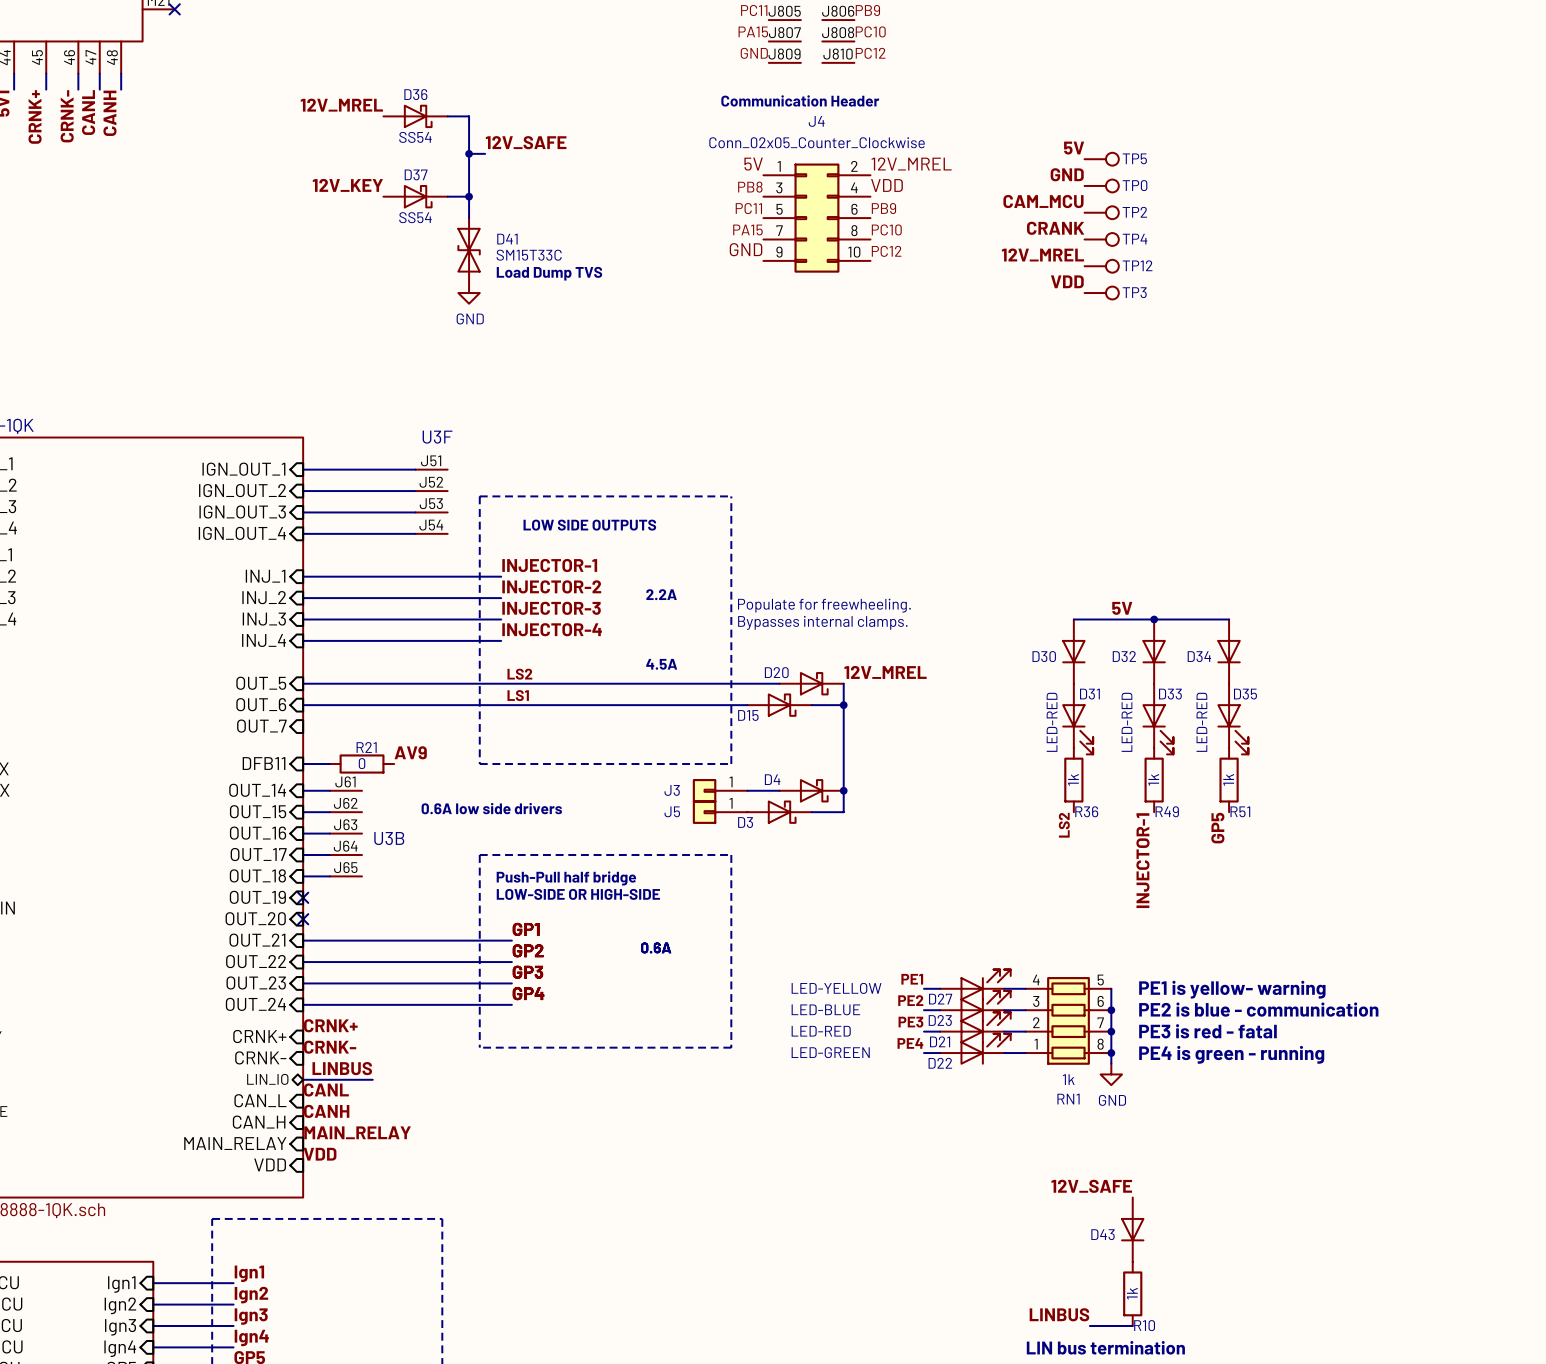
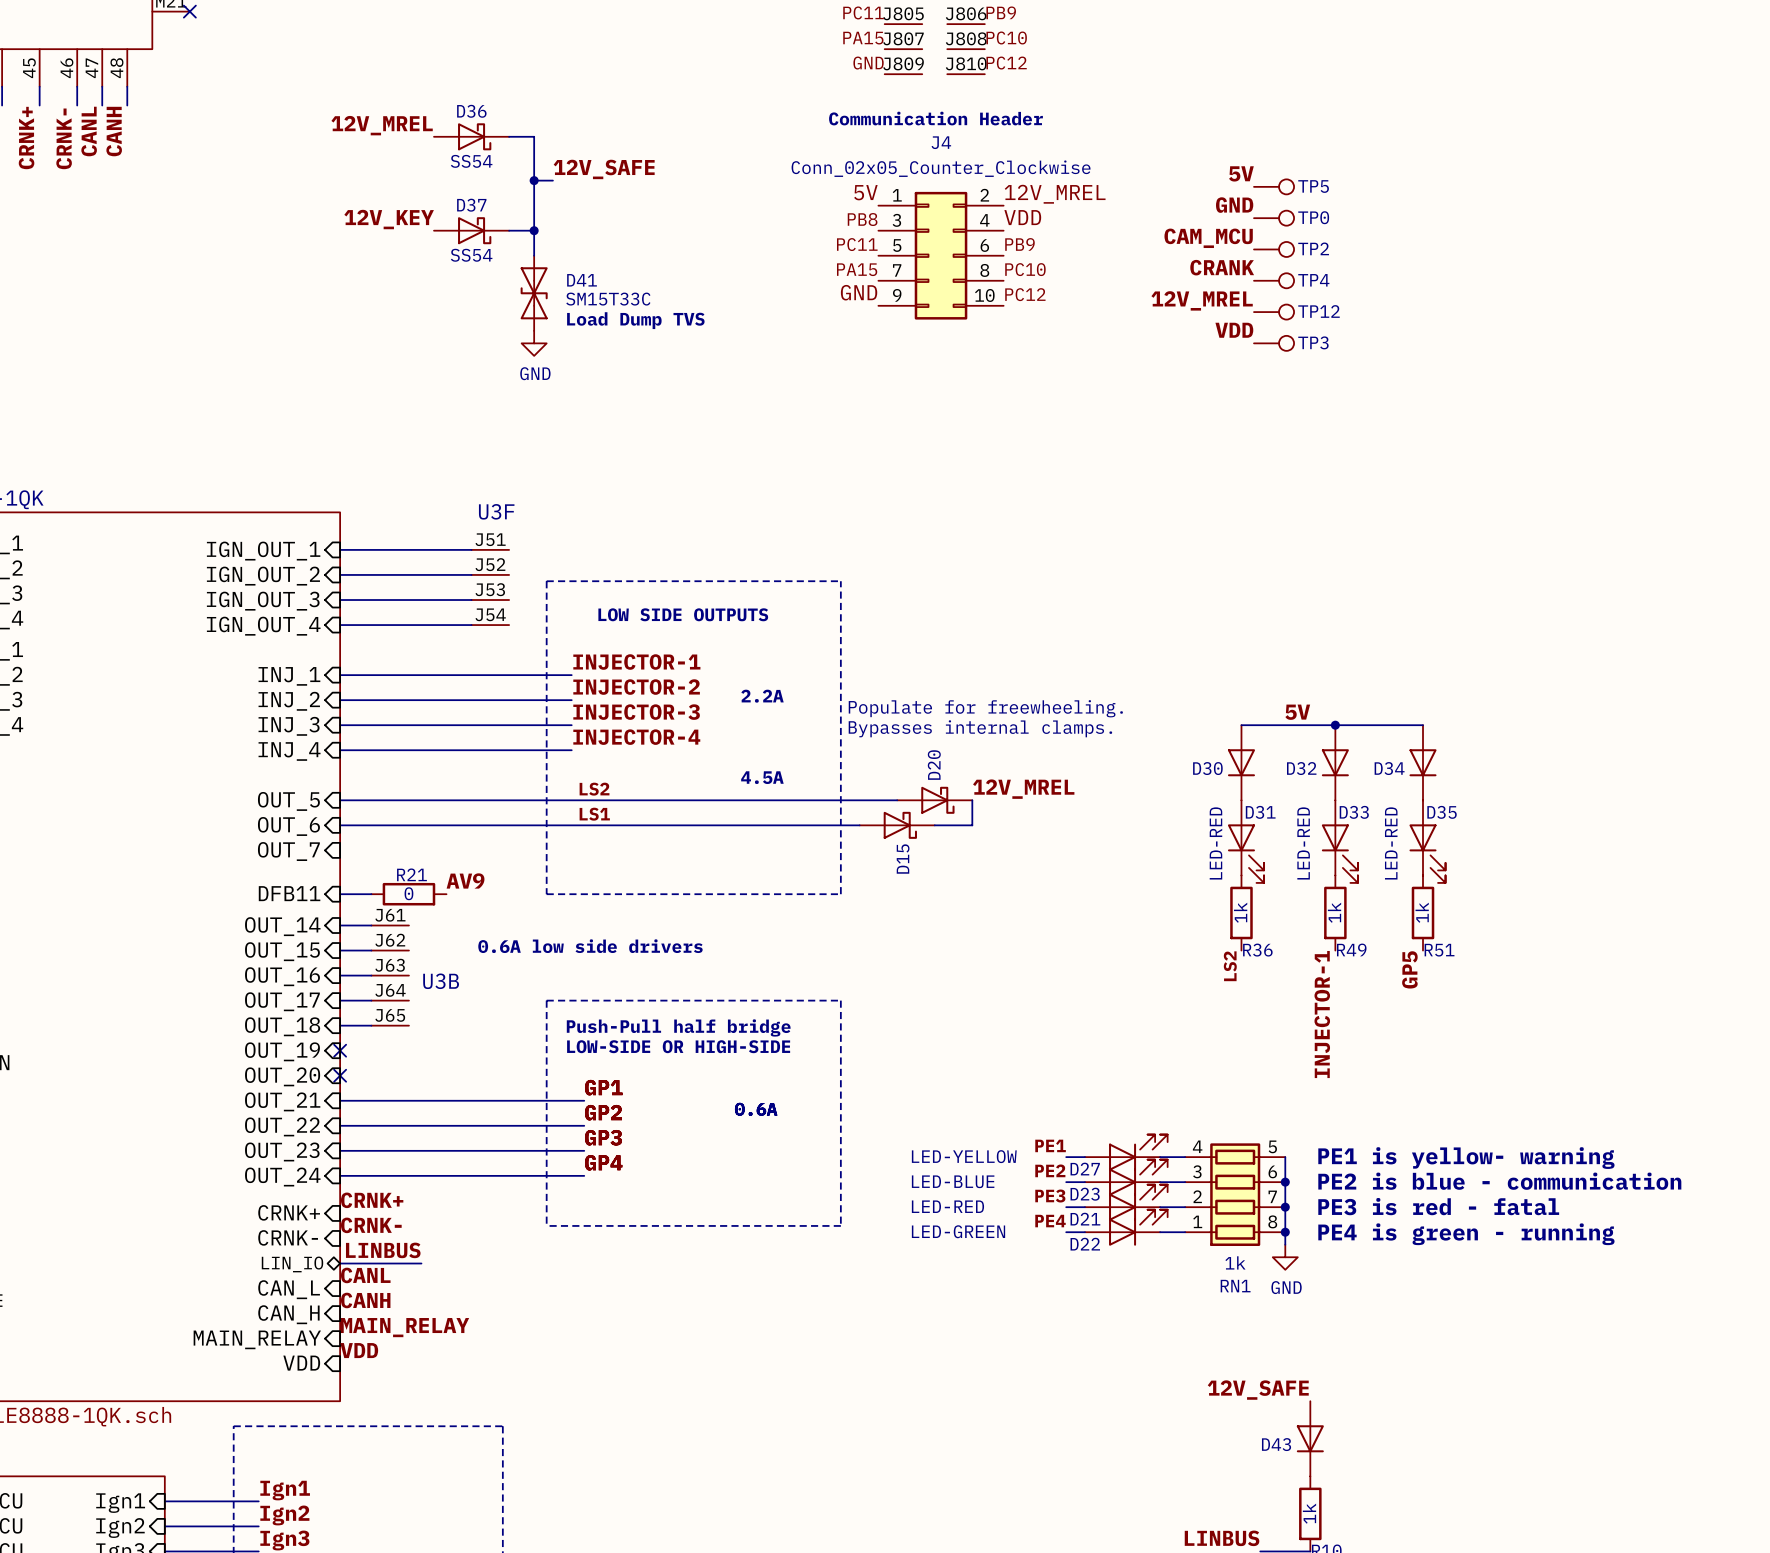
D20 name rotation: 0° (776, 672) -> 90° counterclockwise (934, 765)
D20 name position: D20 (776, 672) -> D20 (934, 765)
wire: (843, 705) (843, 812) (811, 812) -> none
junction: (843, 705) -> none
D15 name rotation: 0° (748, 715) -> 90° counterclockwise (903, 859)
J3: (720, 790) -> none
wire: (747, 790) (779, 790) -> none
D4: (811, 790) -> none
junction: (843, 790) -> none
J5: (720, 812) -> none
D3: (779, 812) -> none

